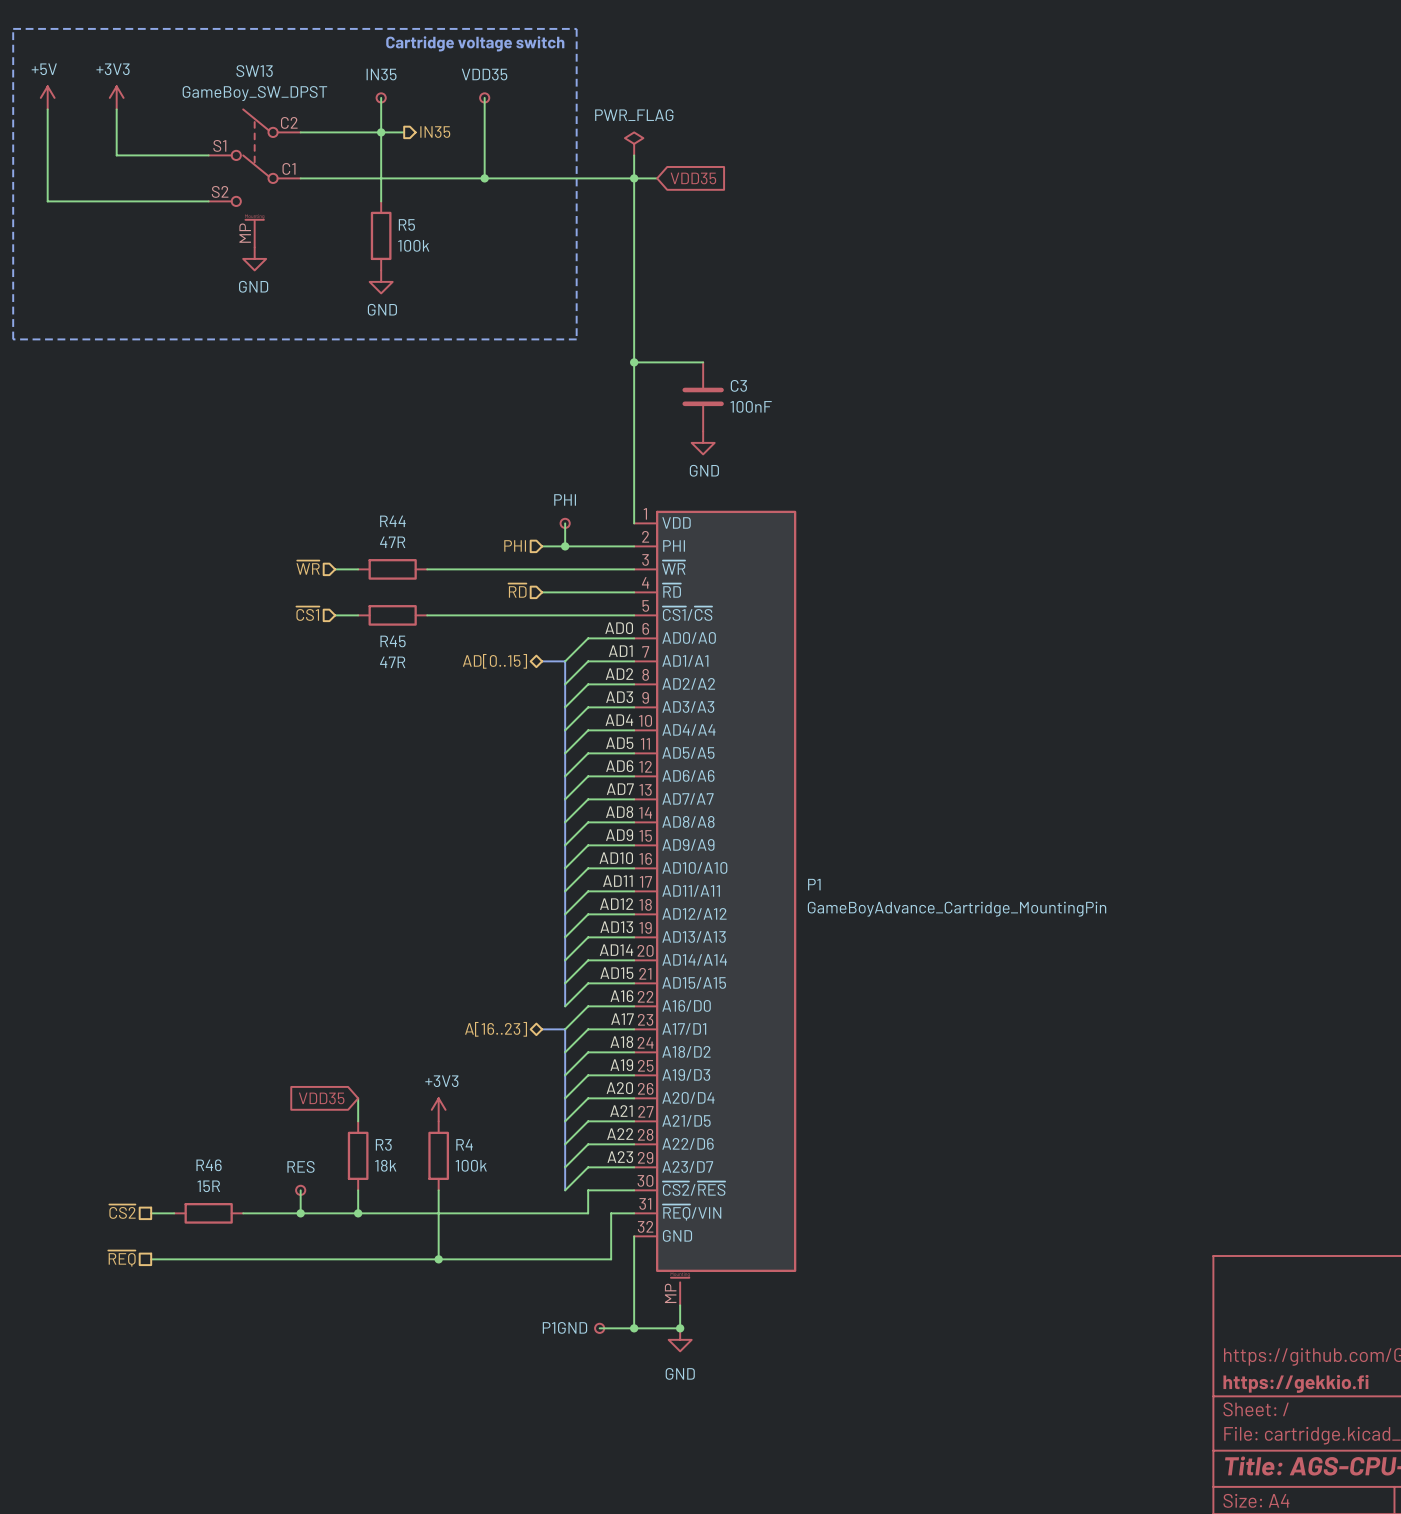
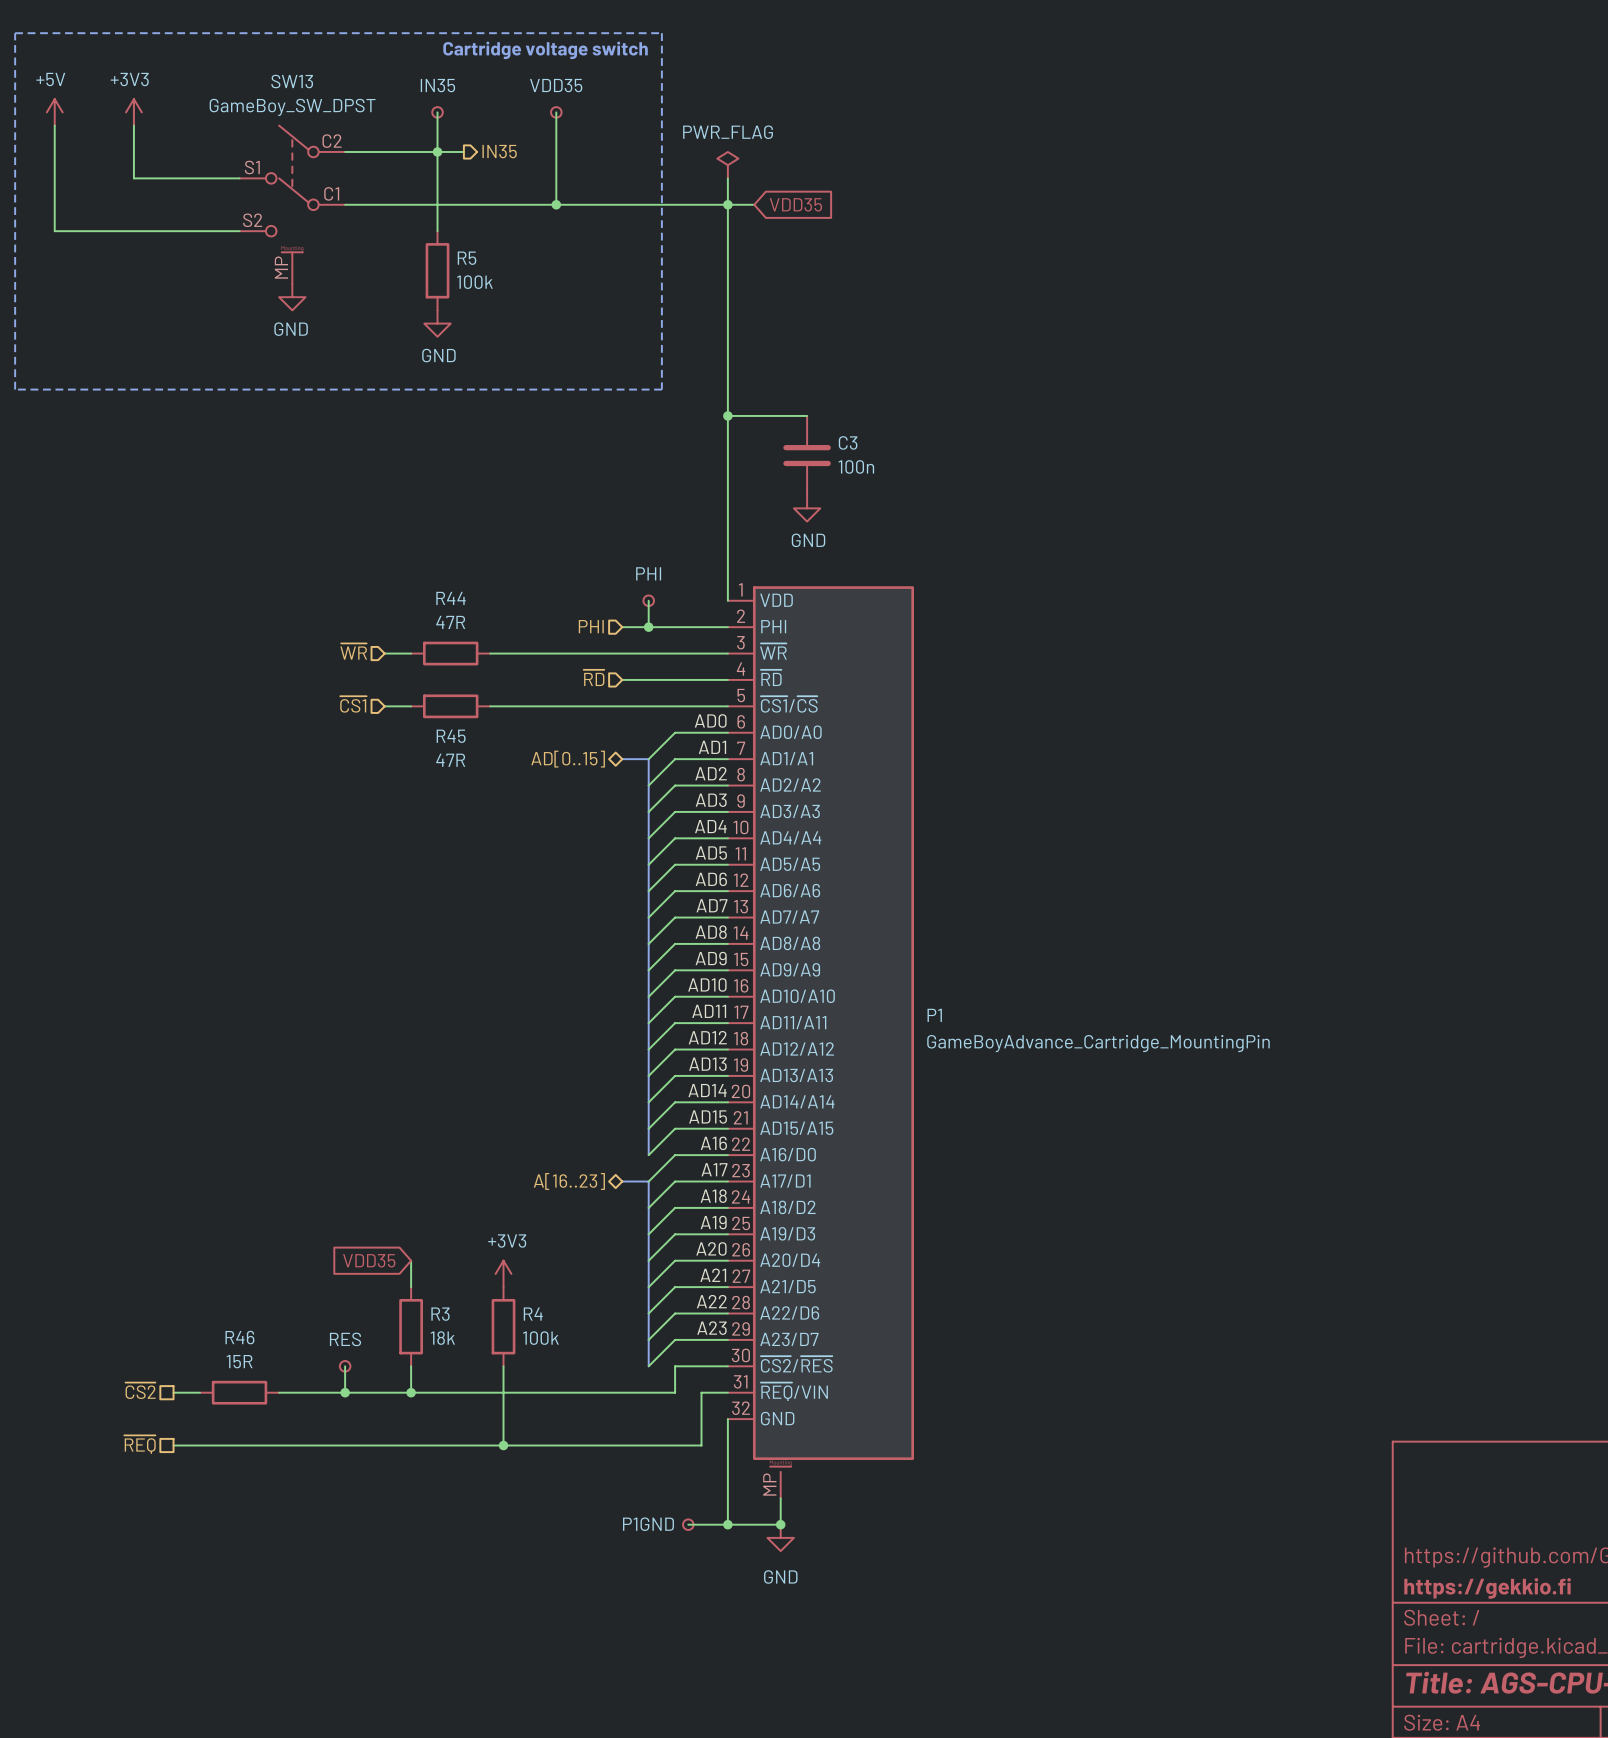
C3 value: 100nF (751, 406) -> 100n (856, 466)

